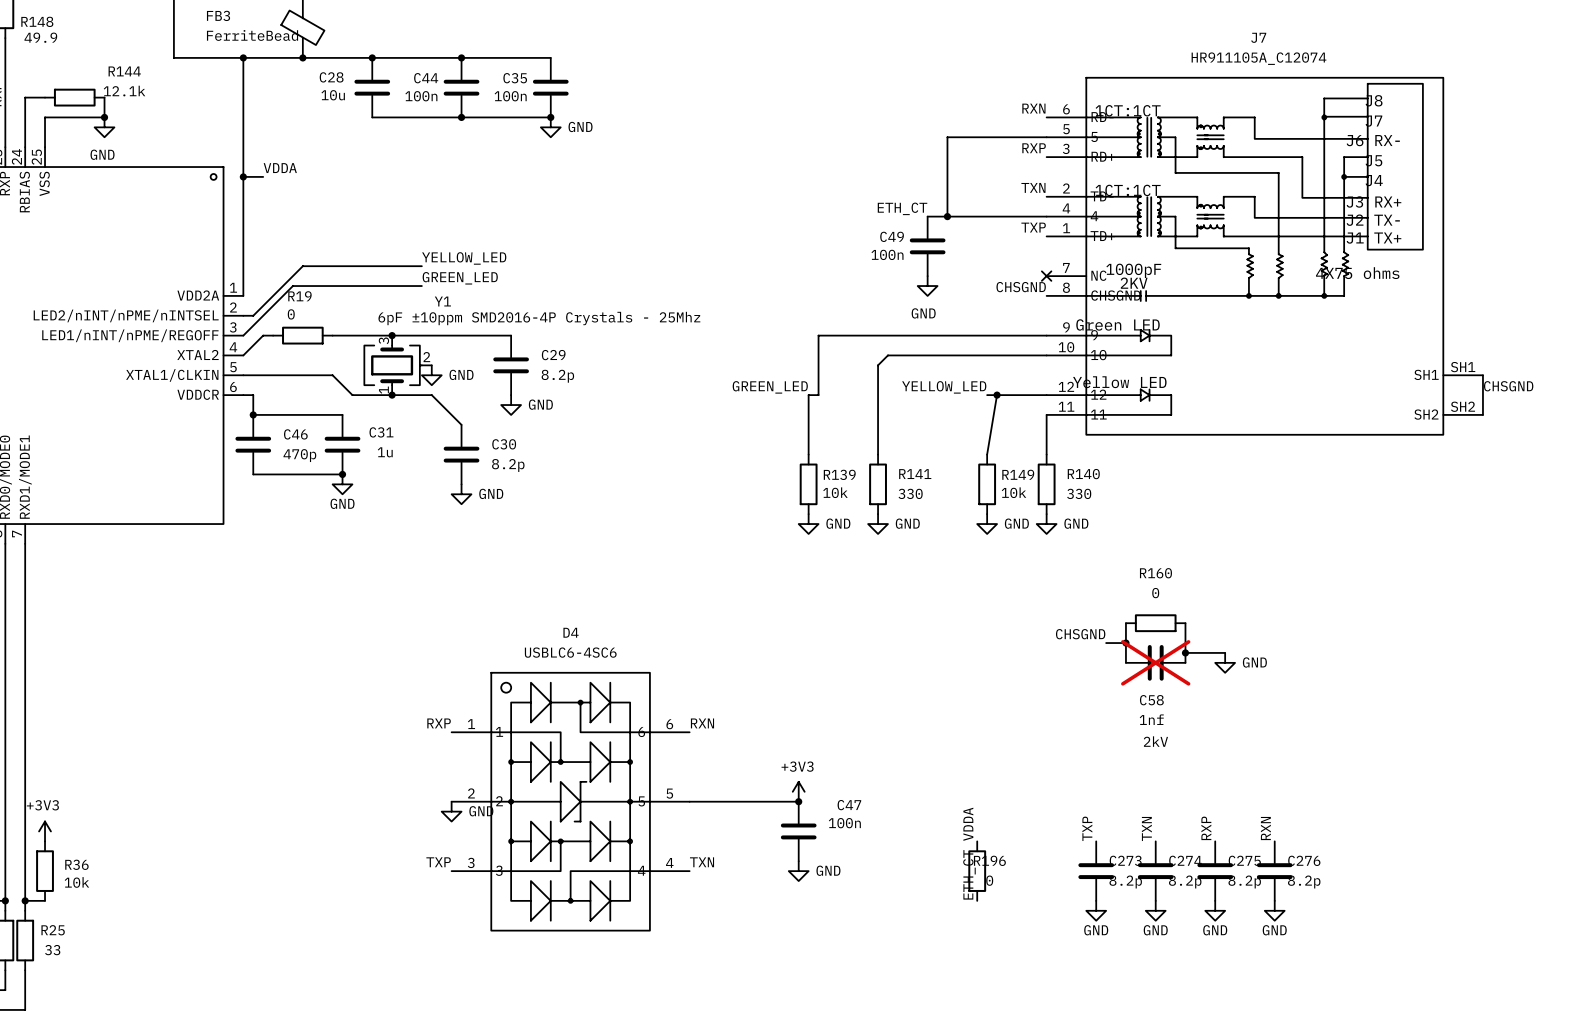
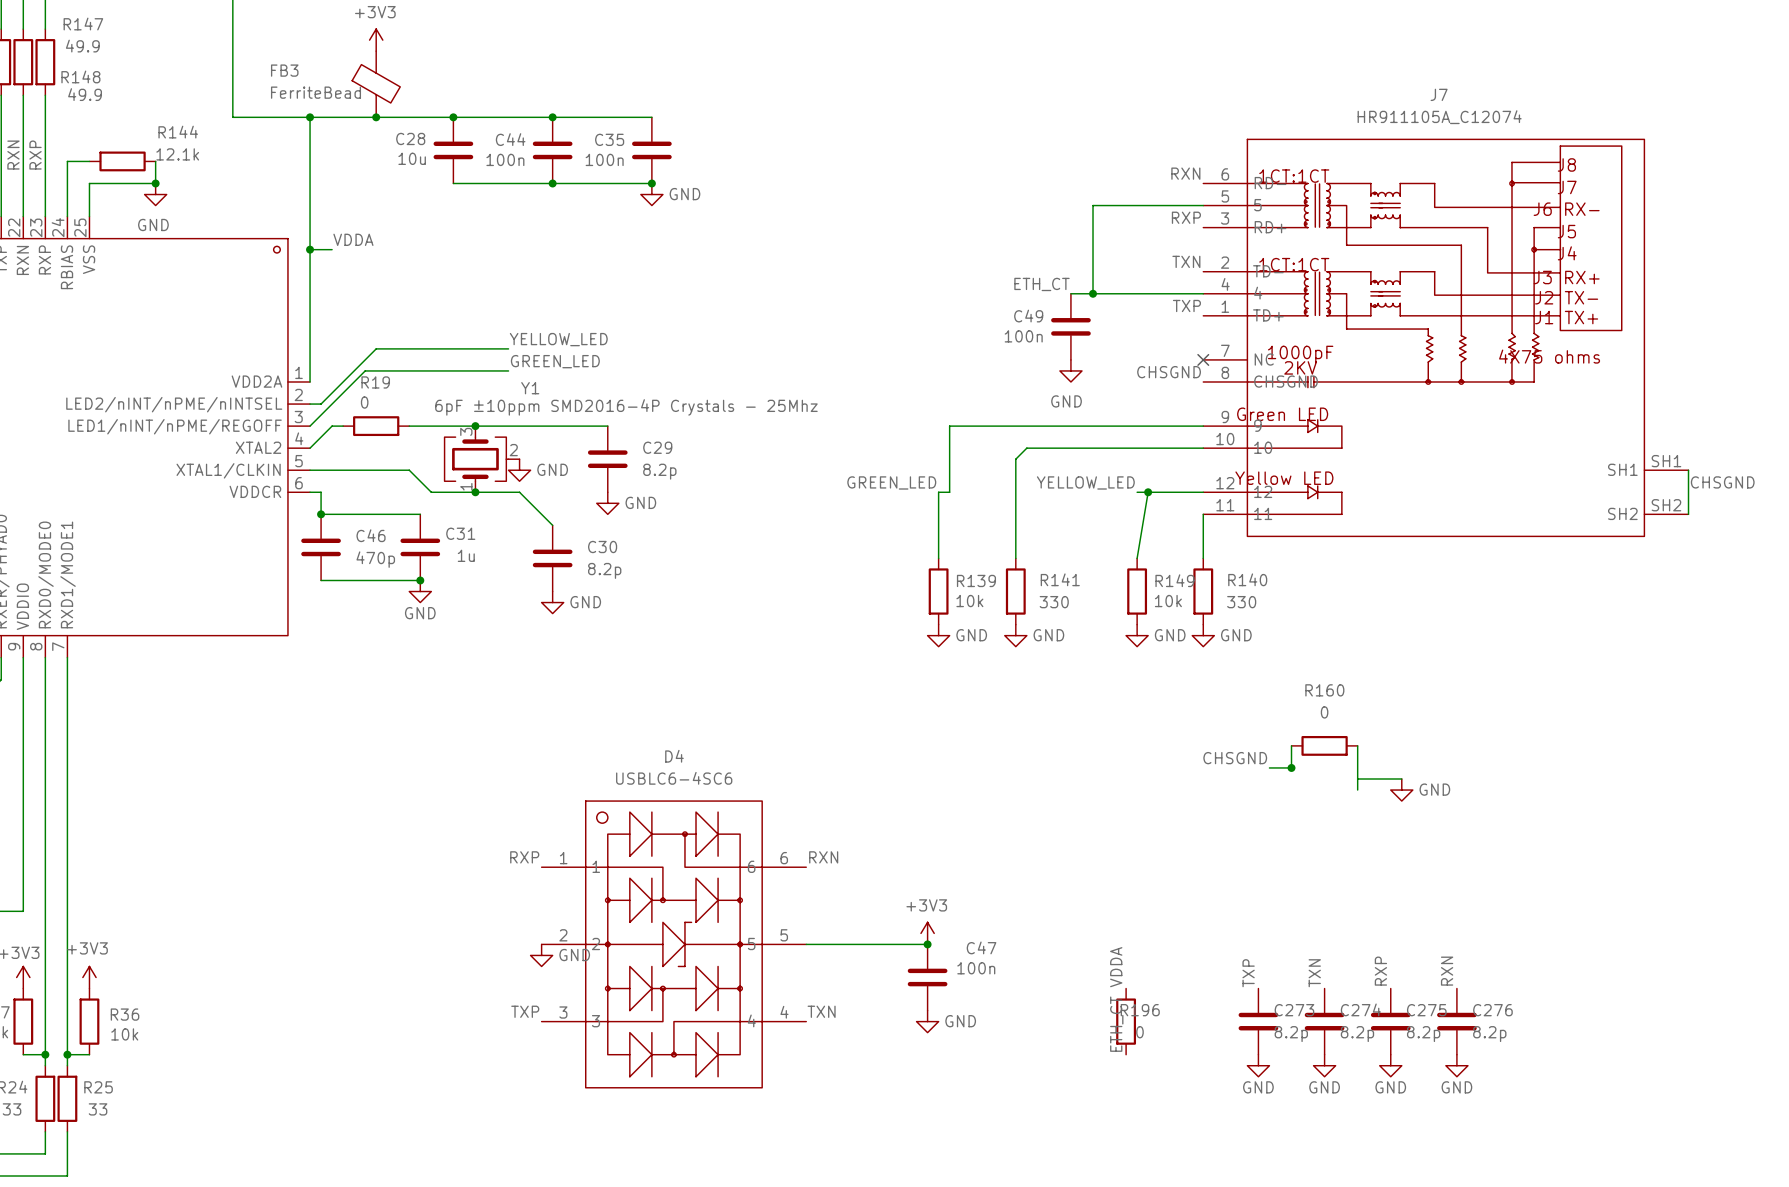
wire: (1125, 643) (1125, 662) -> none
junction: (1185, 652) -> none
C58: 1nf (1155, 662) -> none
text: 2kV (1155, 741) -> none

